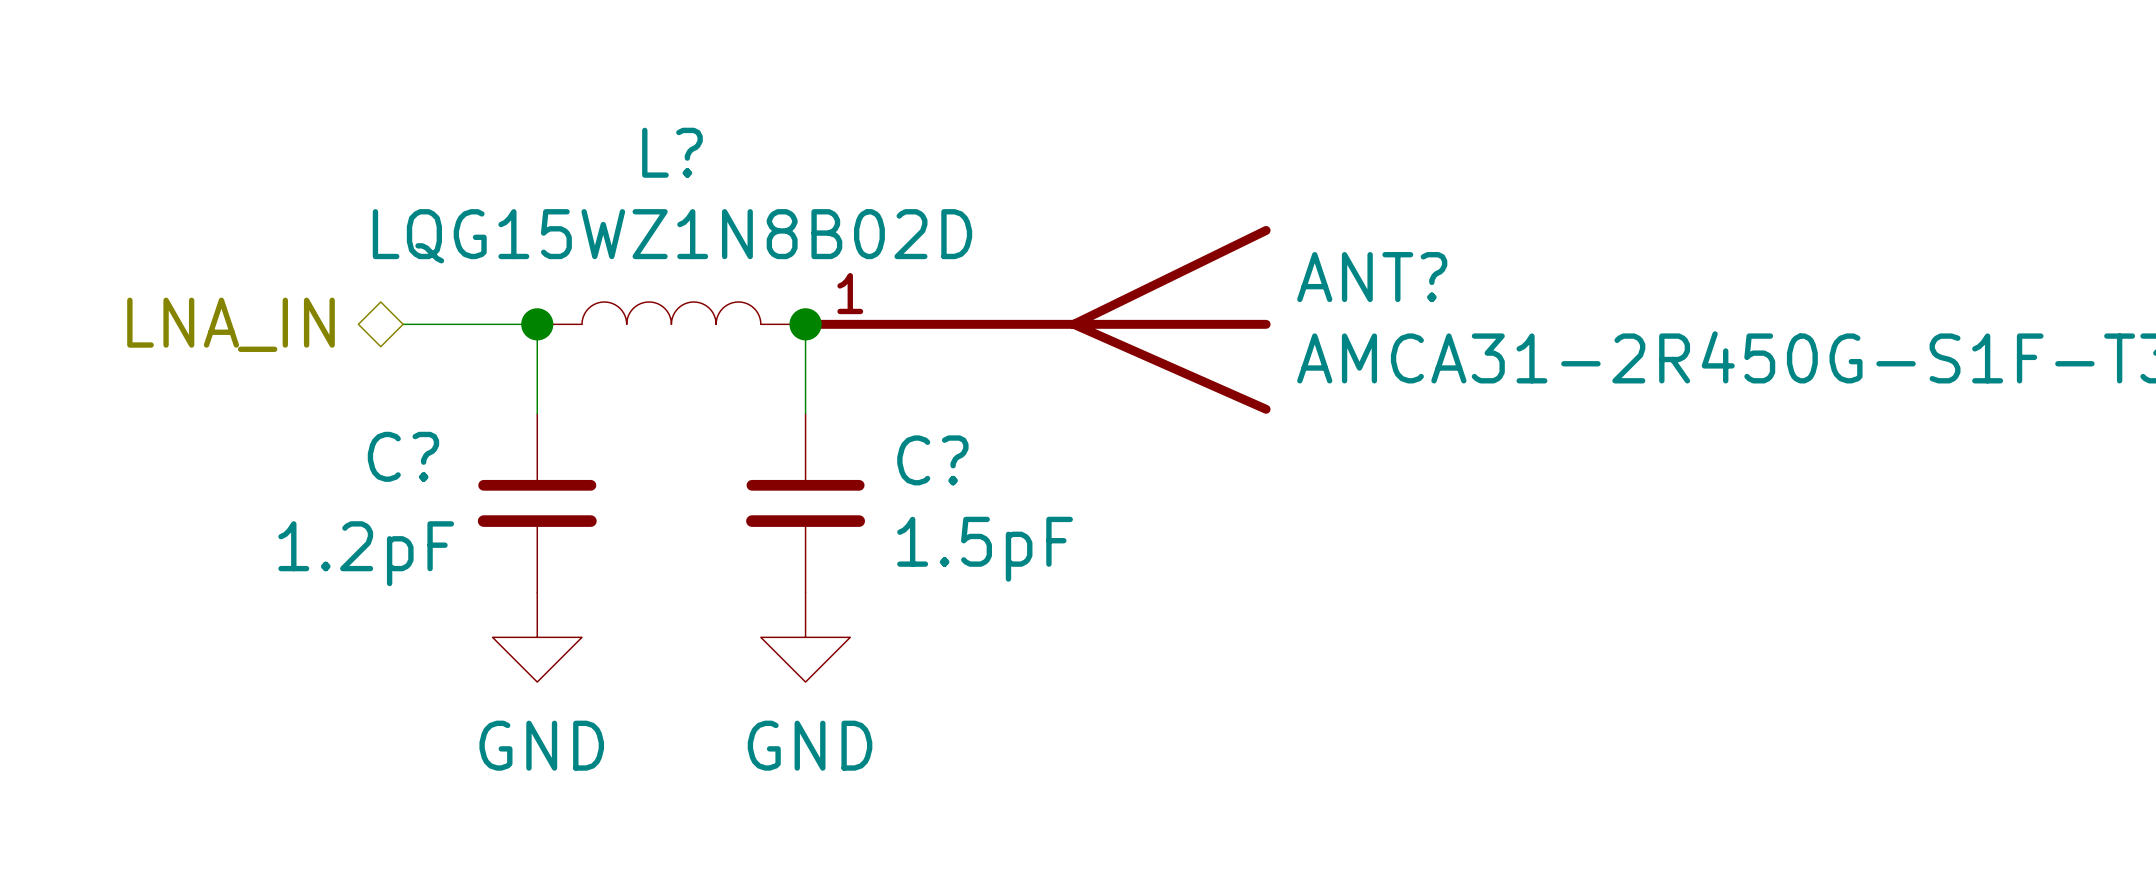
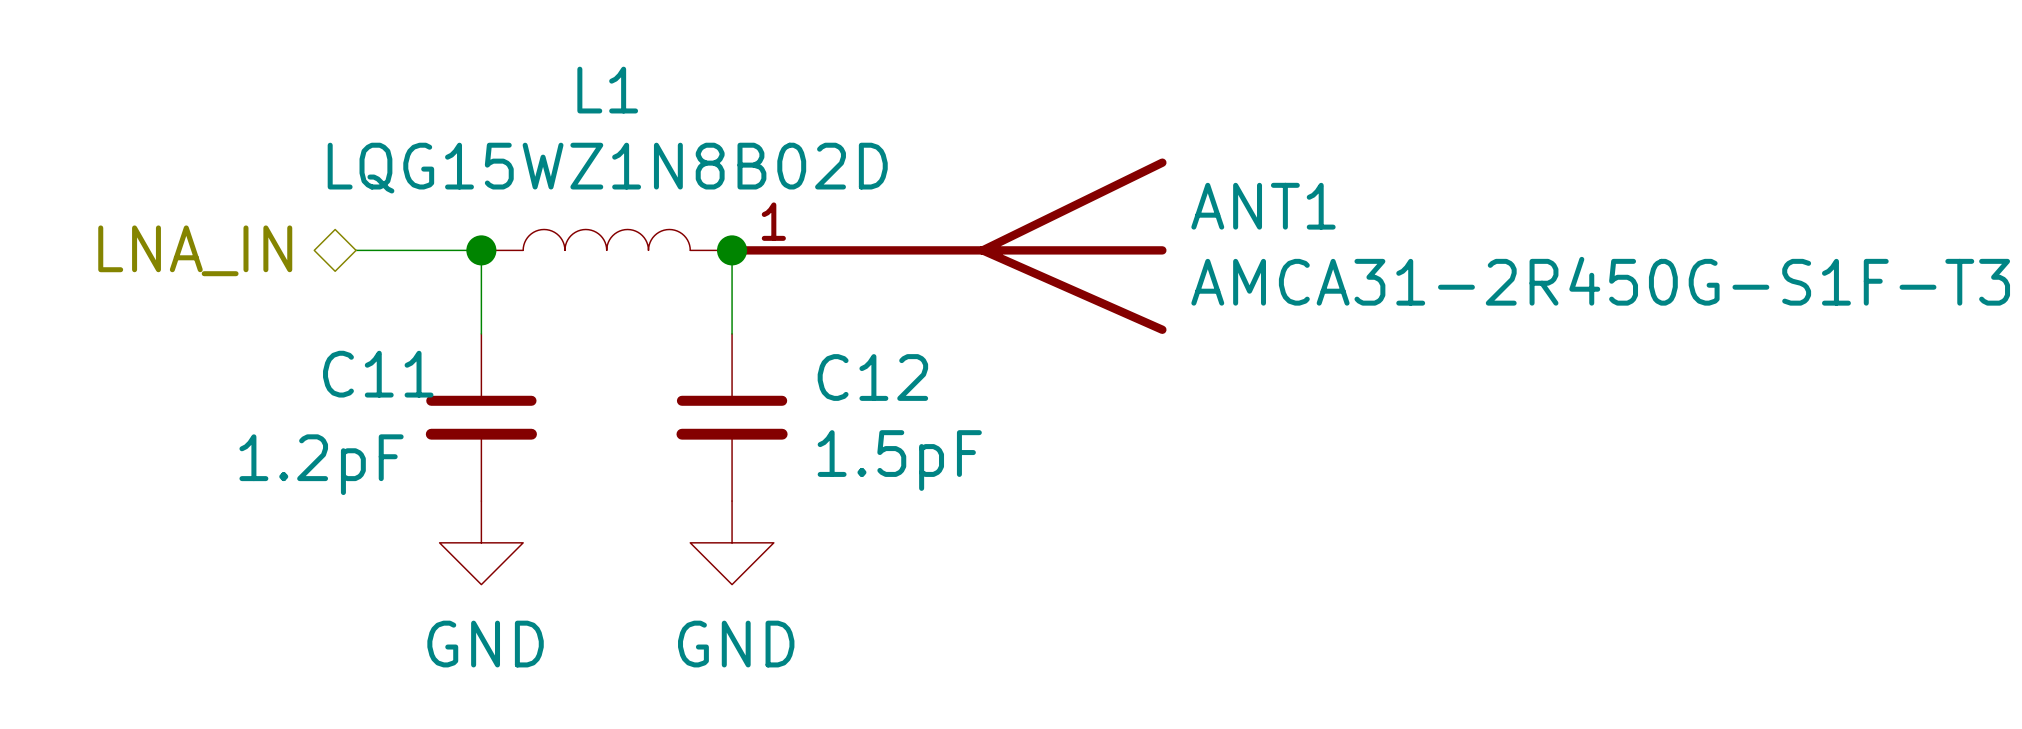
L? name: L? (672, 152) -> L1 (607, 90)
ANT? name: ANT? (1372, 277) -> ANT1 (1263, 206)
C? name: C? (403, 456) -> C11 (378, 374)
C? name: C? (932, 460) -> C12 (872, 377)

